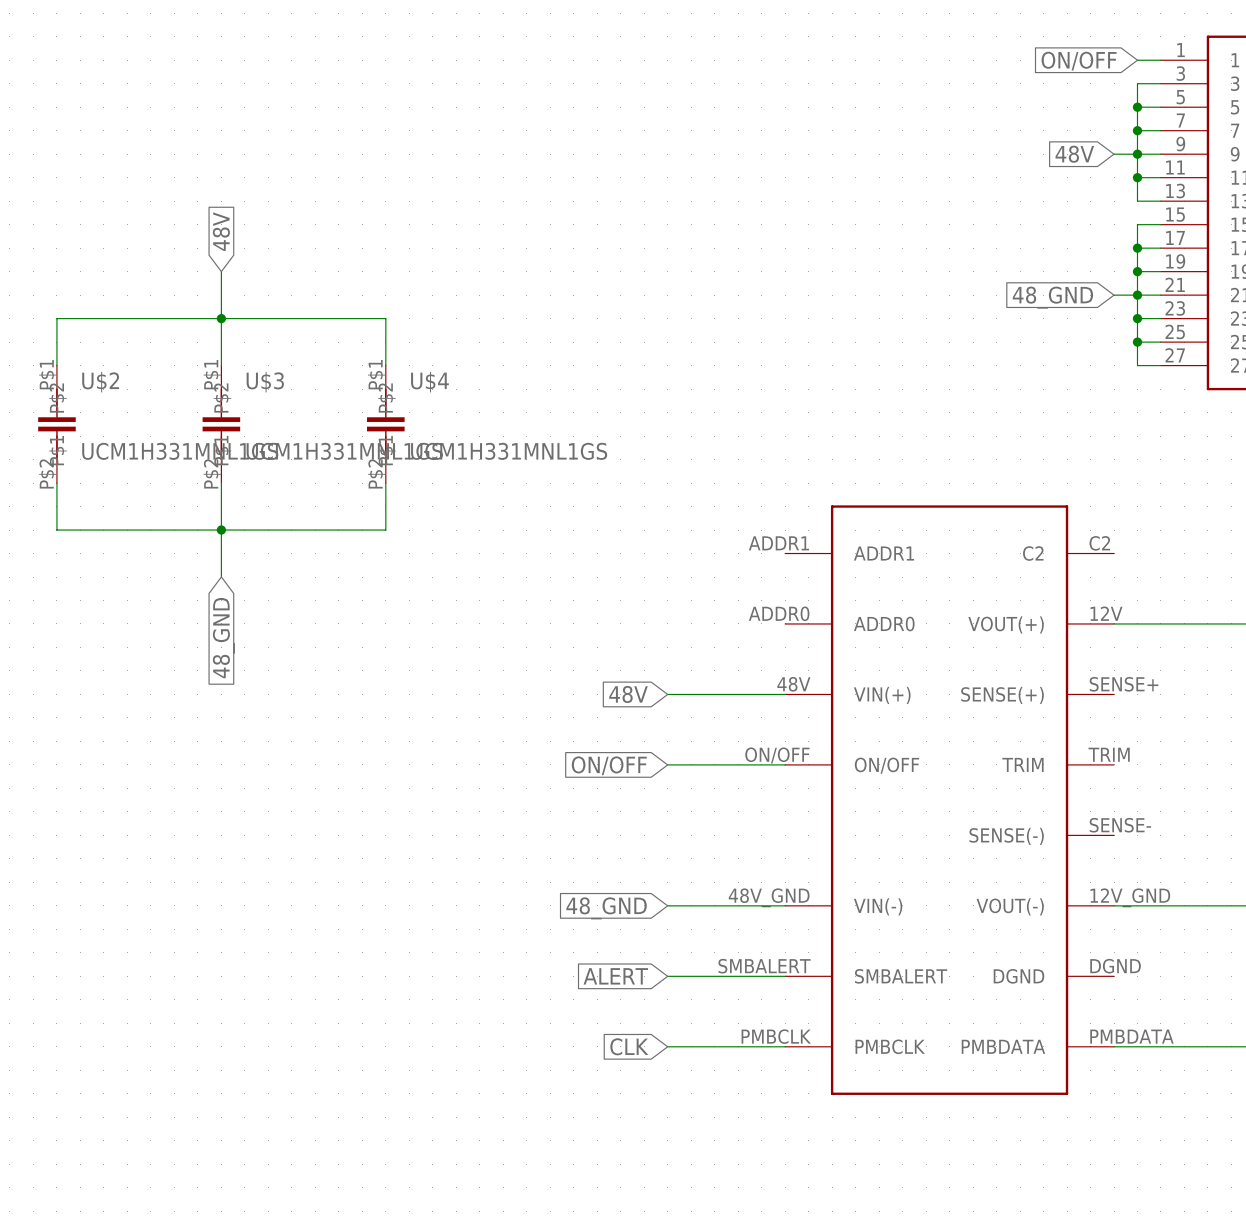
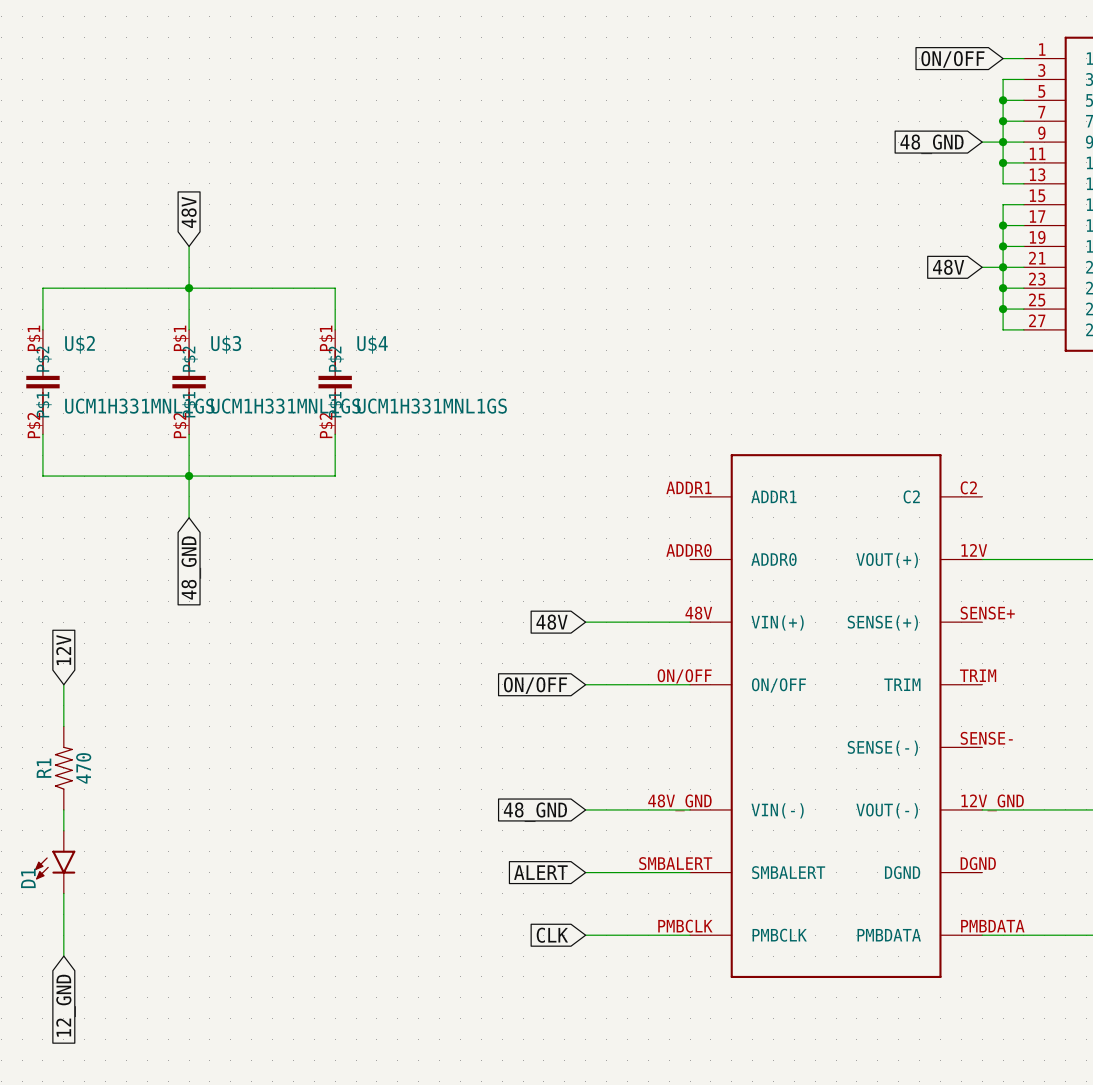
global label: 48V (1074, 154) -> 48_GND (931, 144)
global label: 48_GND (1052, 297) -> 48V (948, 267)
global label: none -> 12V (63, 650)
wire: none -> (63, 684) (63, 726)
R1: none -> 470 (63, 768)
wire: none -> (63, 809) (63, 830)
D1: none -> (55, 862)
wire: none -> (63, 893) (63, 956)
global label: none -> 12_GND (66, 1005)

